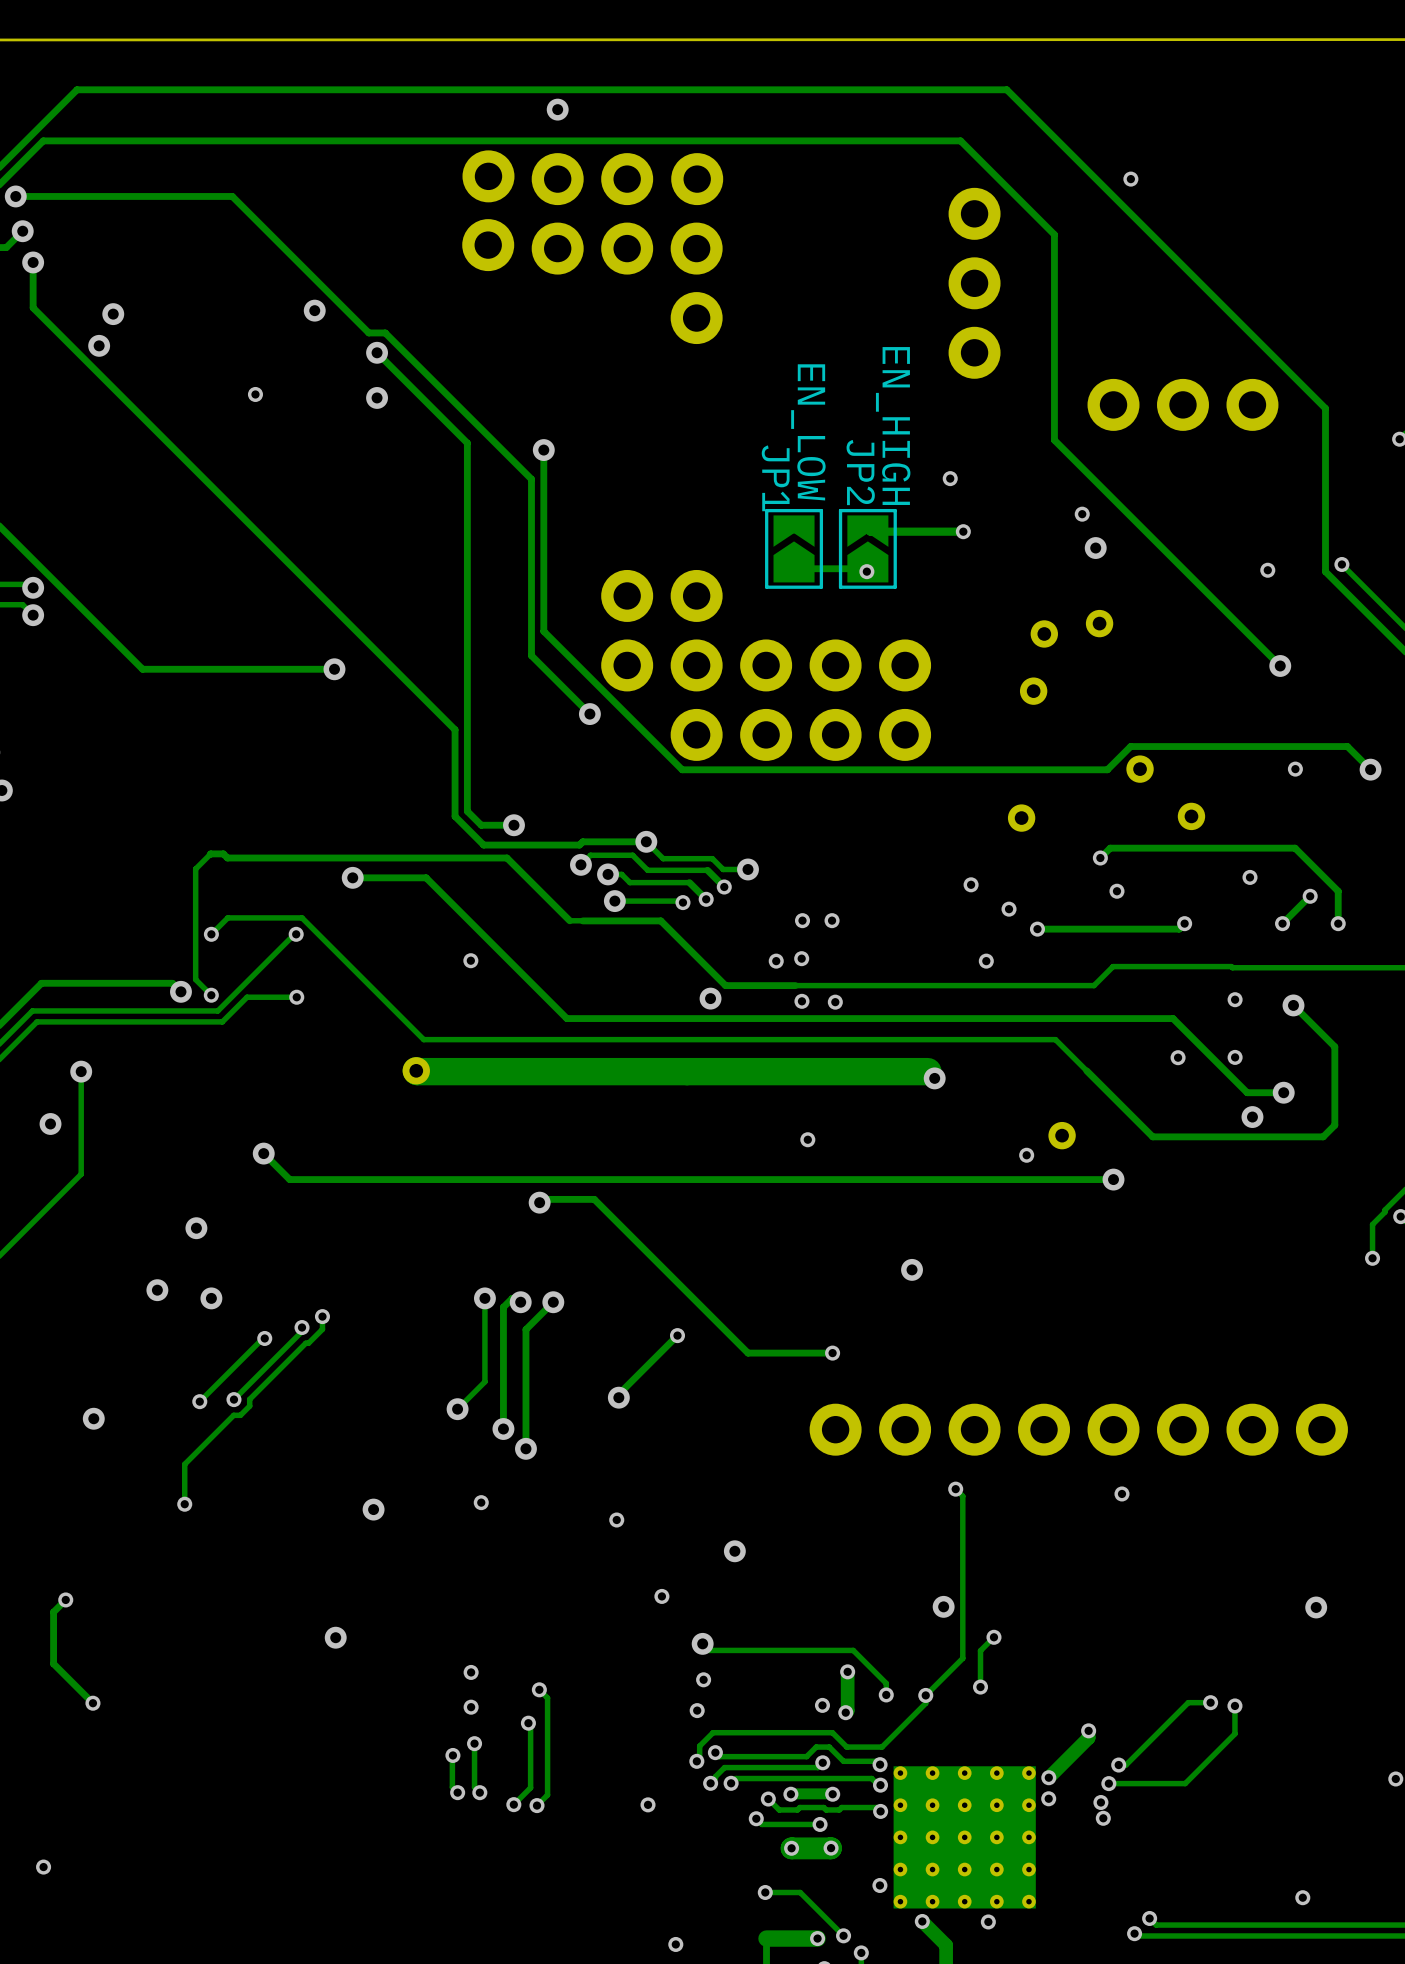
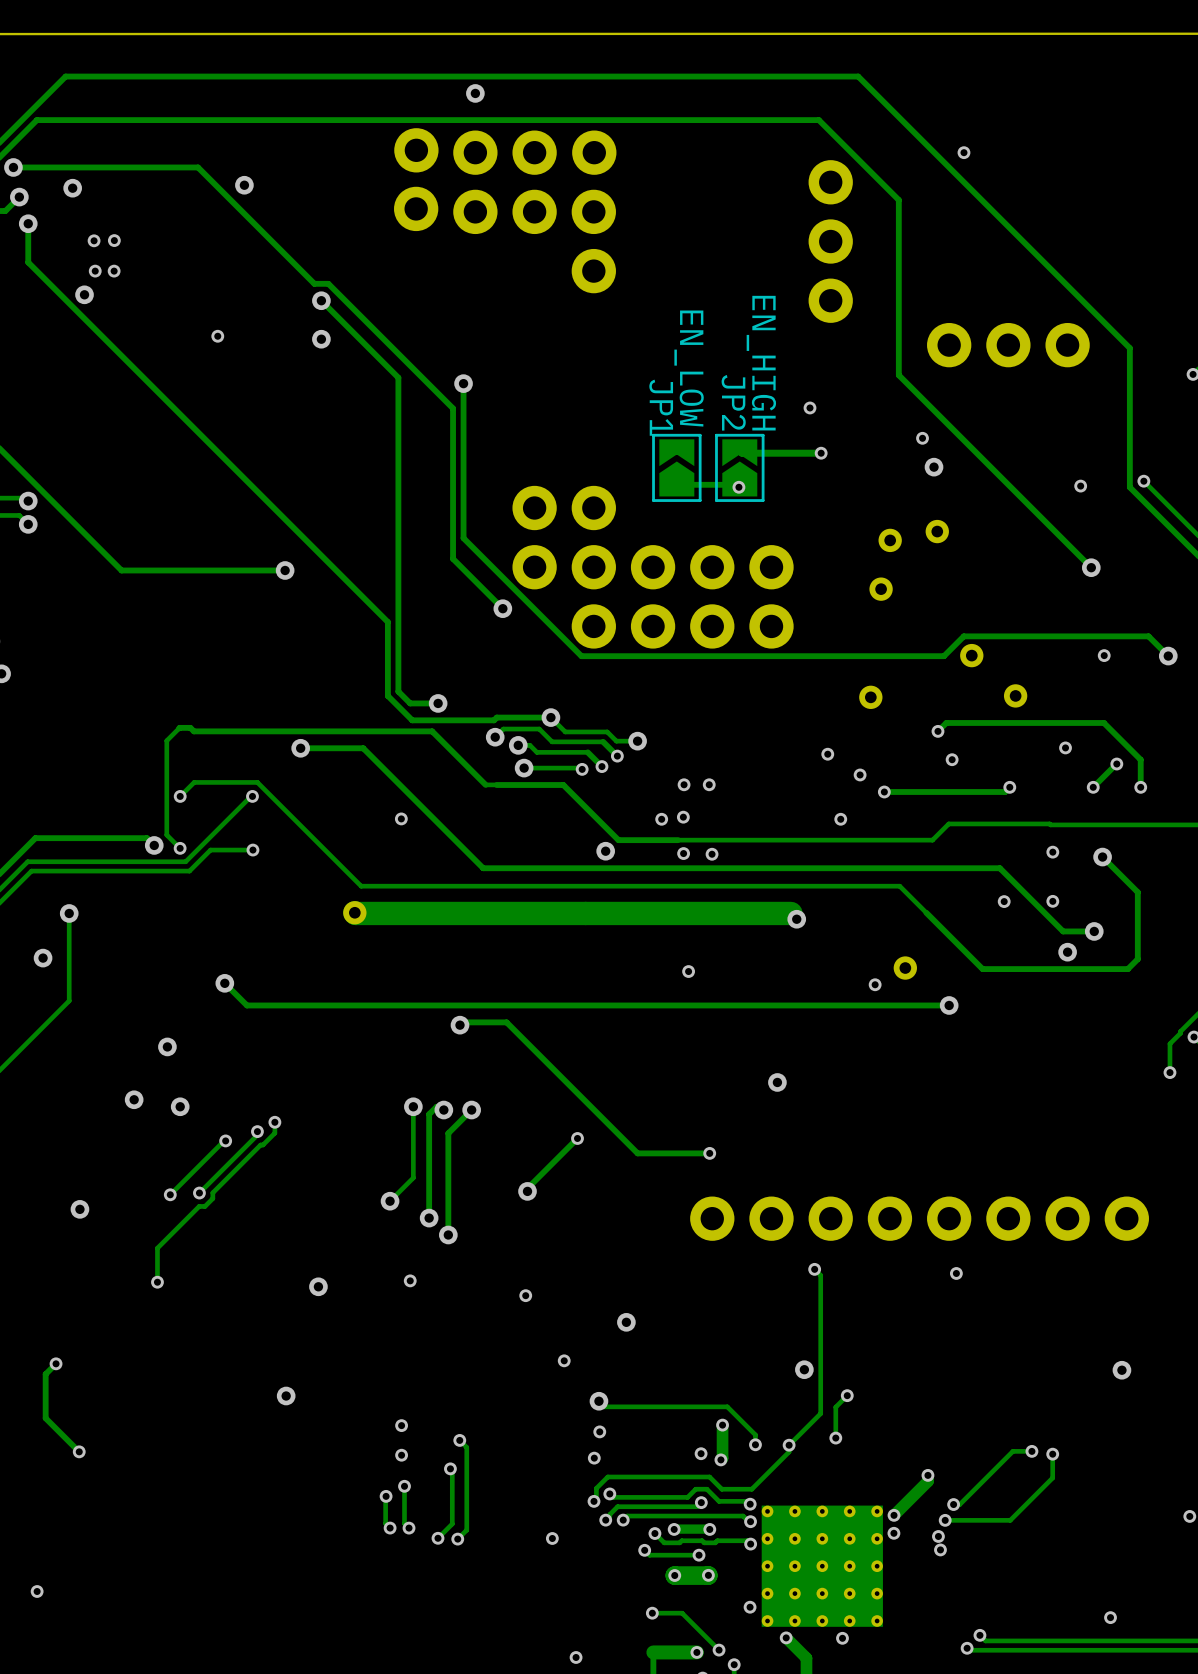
via: none -> (94, 240)
via: none -> (114, 240)
via position: (314, 310) -> (244, 185)
via position: (113, 314) -> (72, 188)
via: none -> (95, 271)
via: none -> (114, 271)

